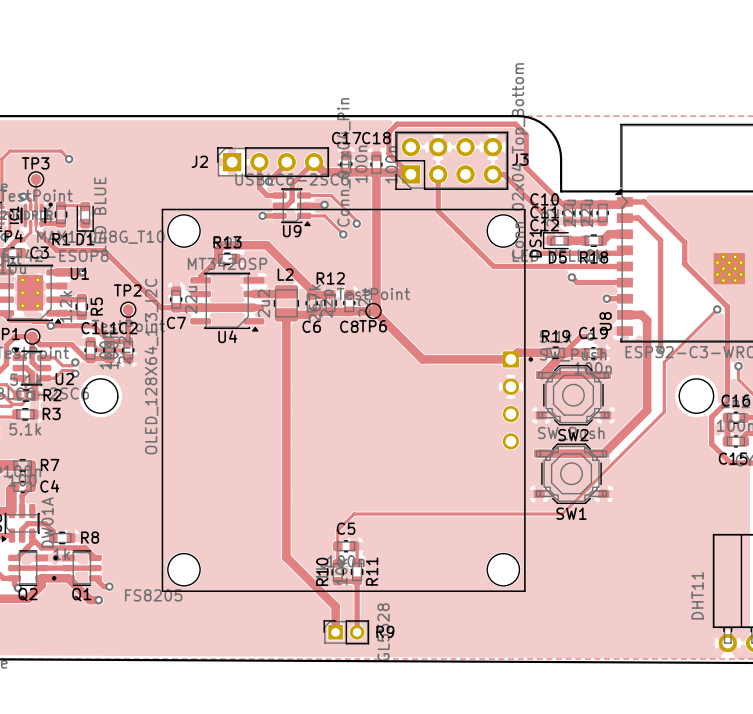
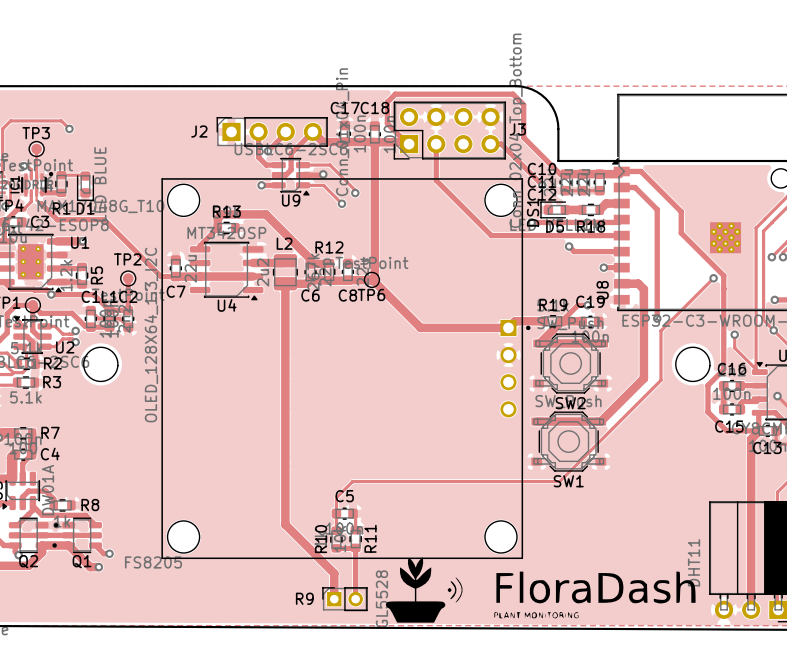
drawing: none -> [385, 557, 696, 623]
R9 name position: R9 (385, 631) -> R9 (304, 598)

